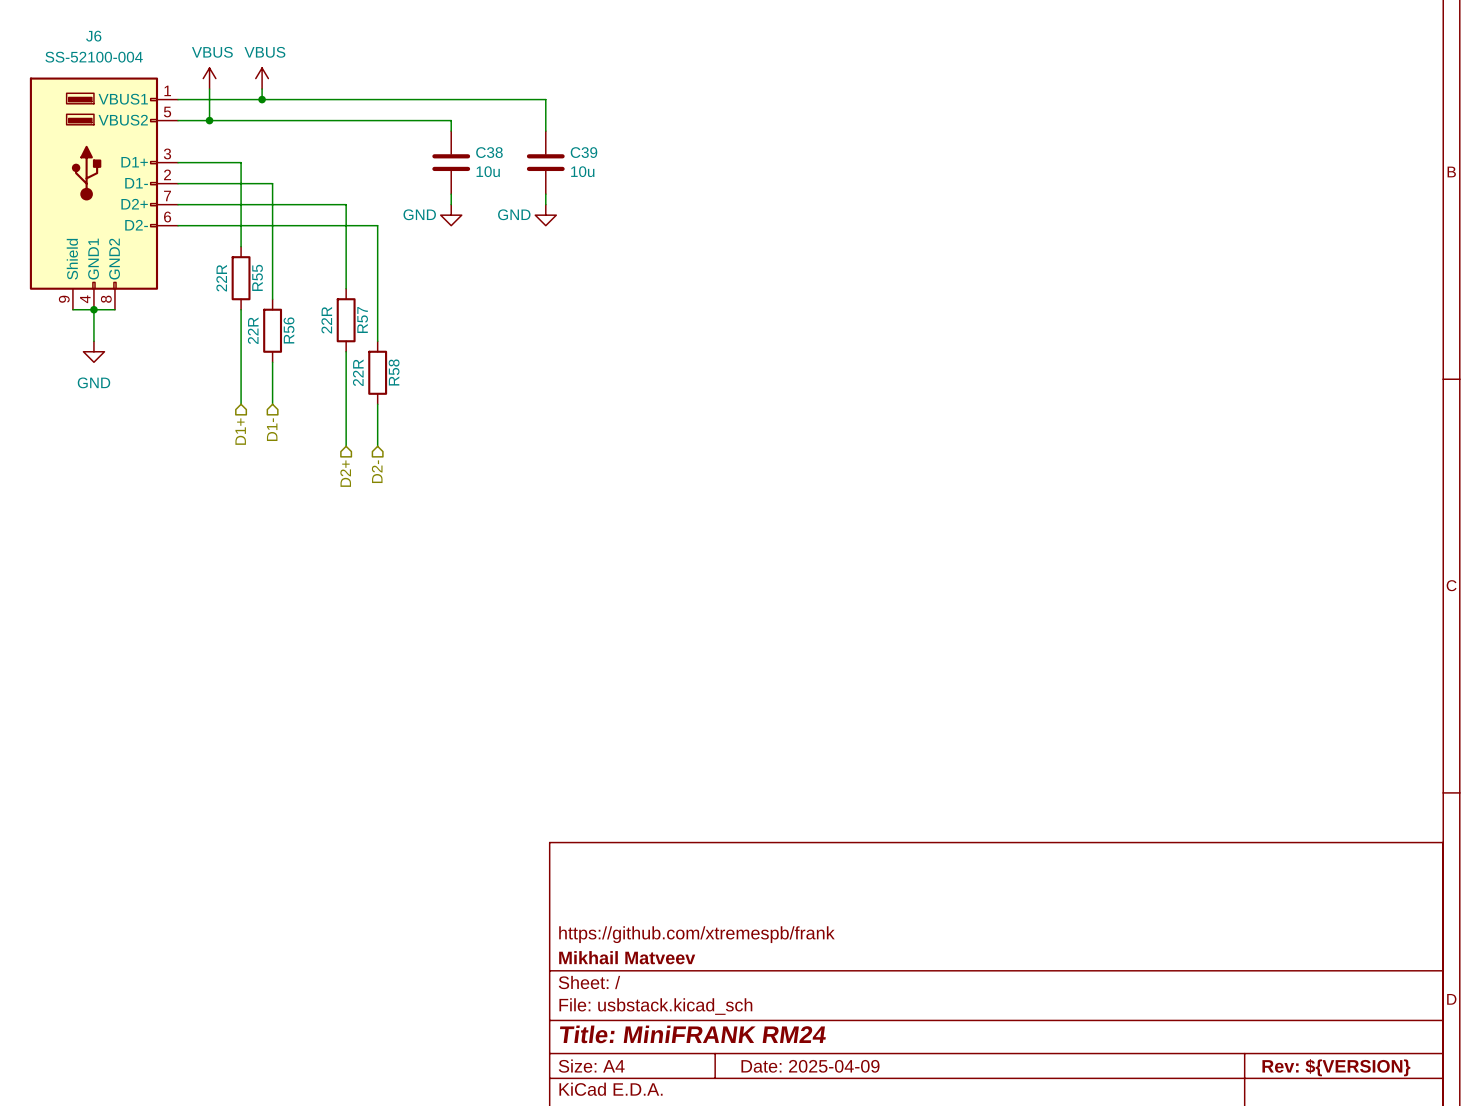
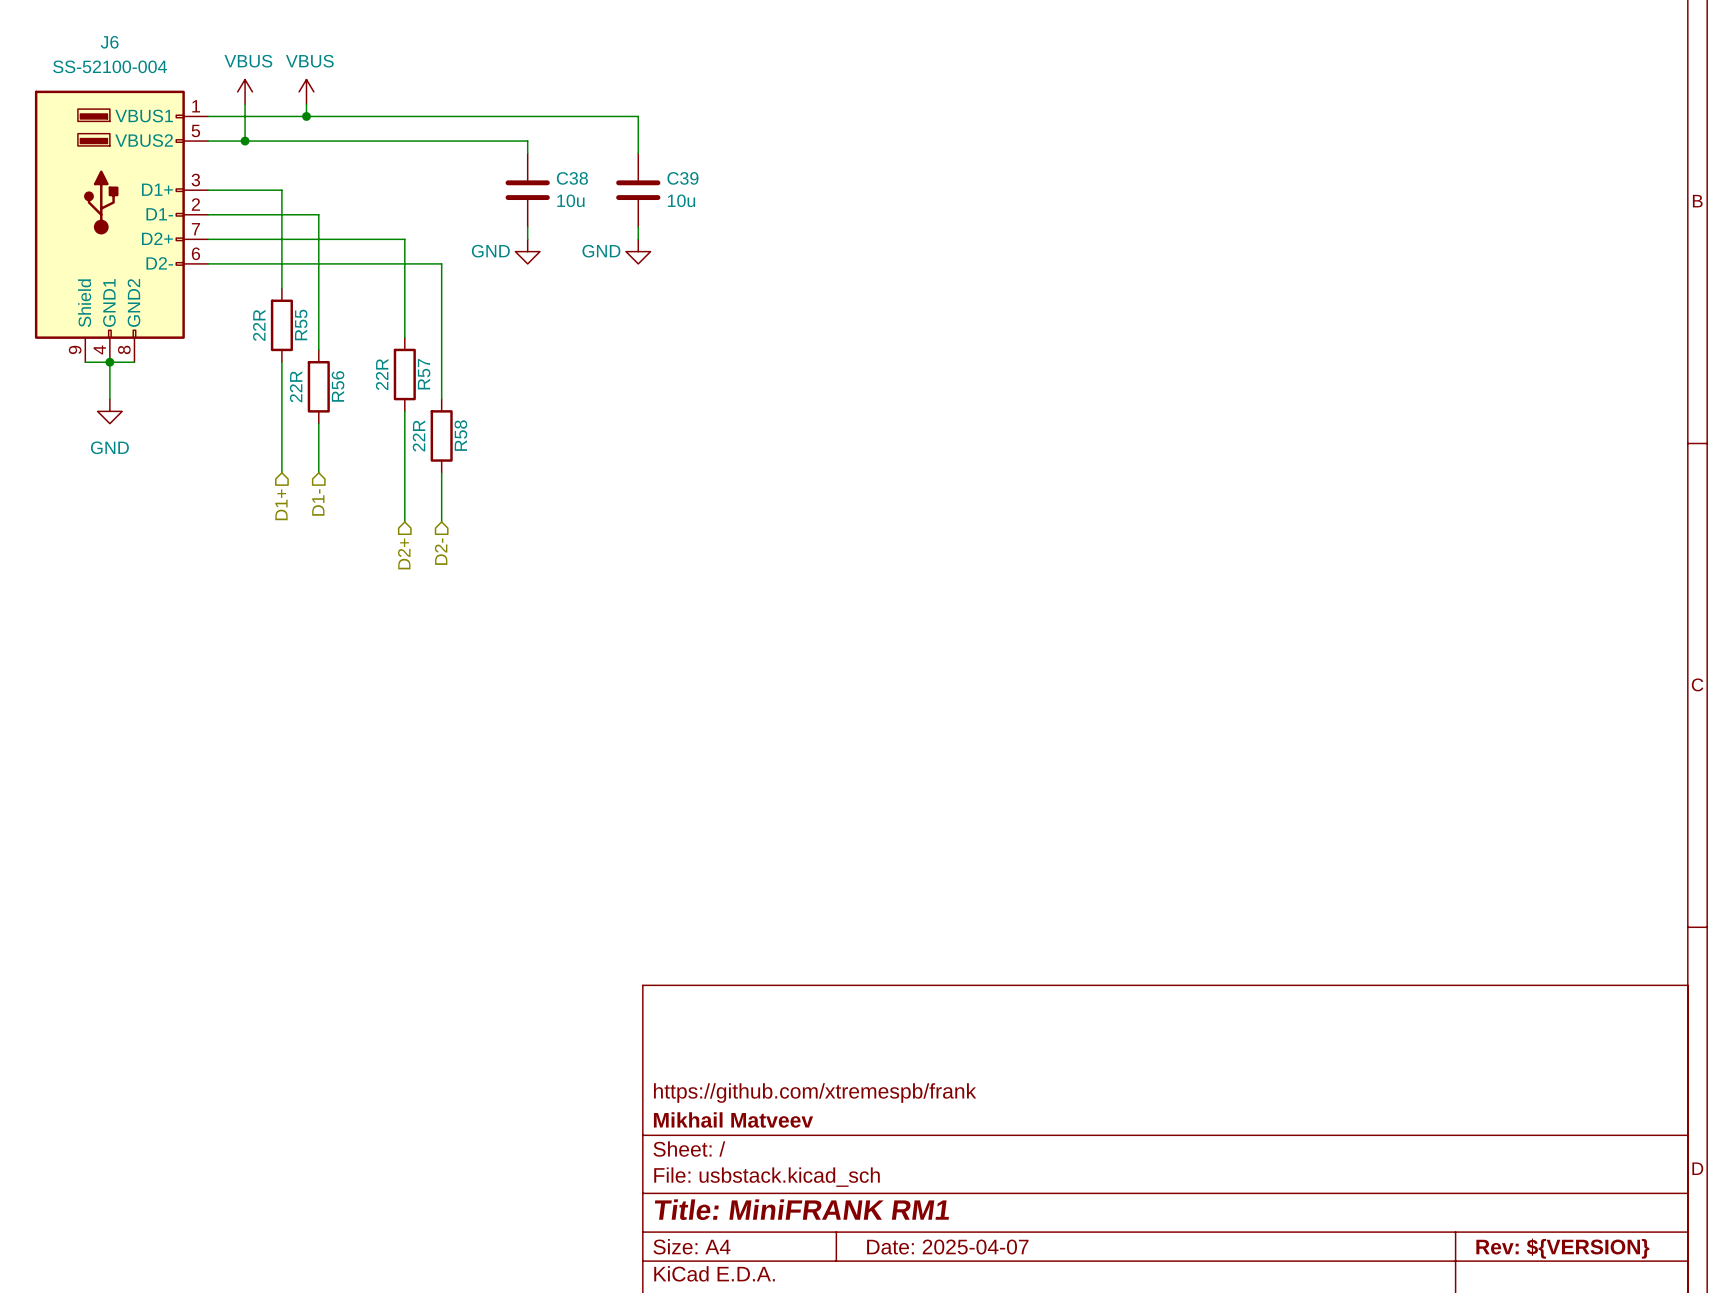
title block: Title: MiniFRANK RM24 (692, 1034) -> Title: MiniFRANK RM1 (801, 1209)
title block: Date: 2025-04-09 (810, 1066) -> Date: 2025-04-07 (947, 1247)

